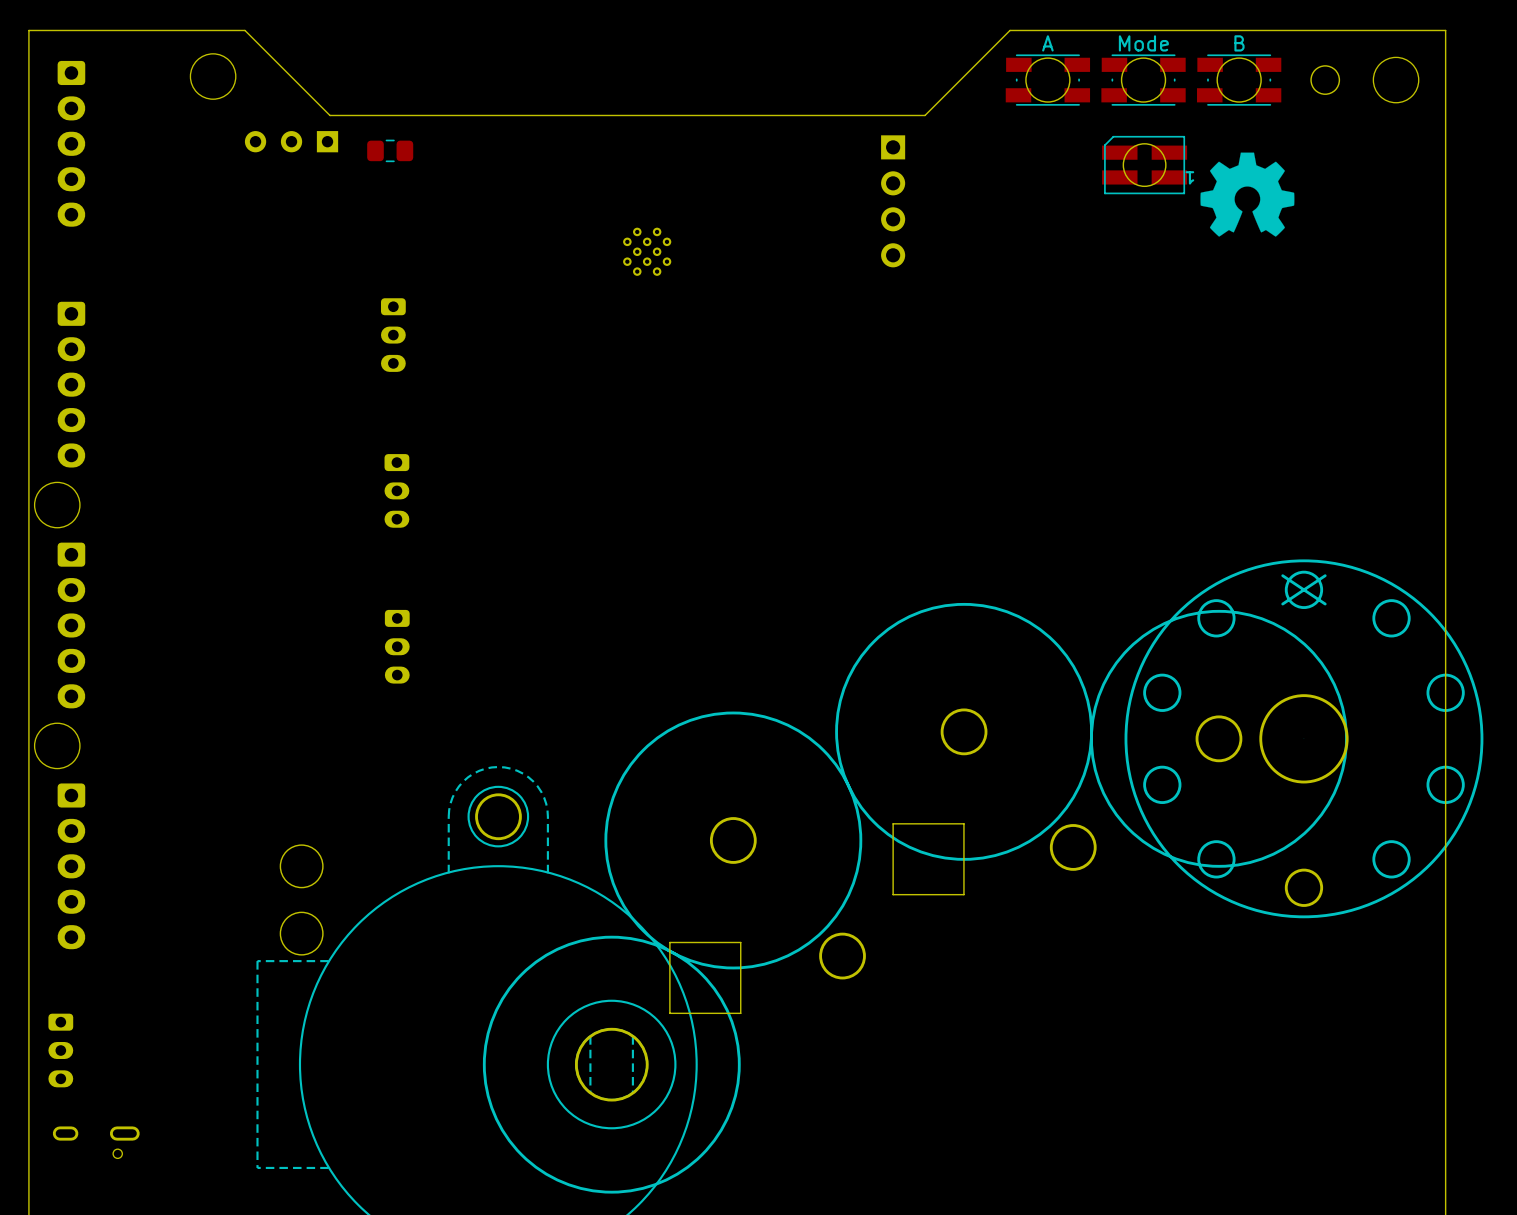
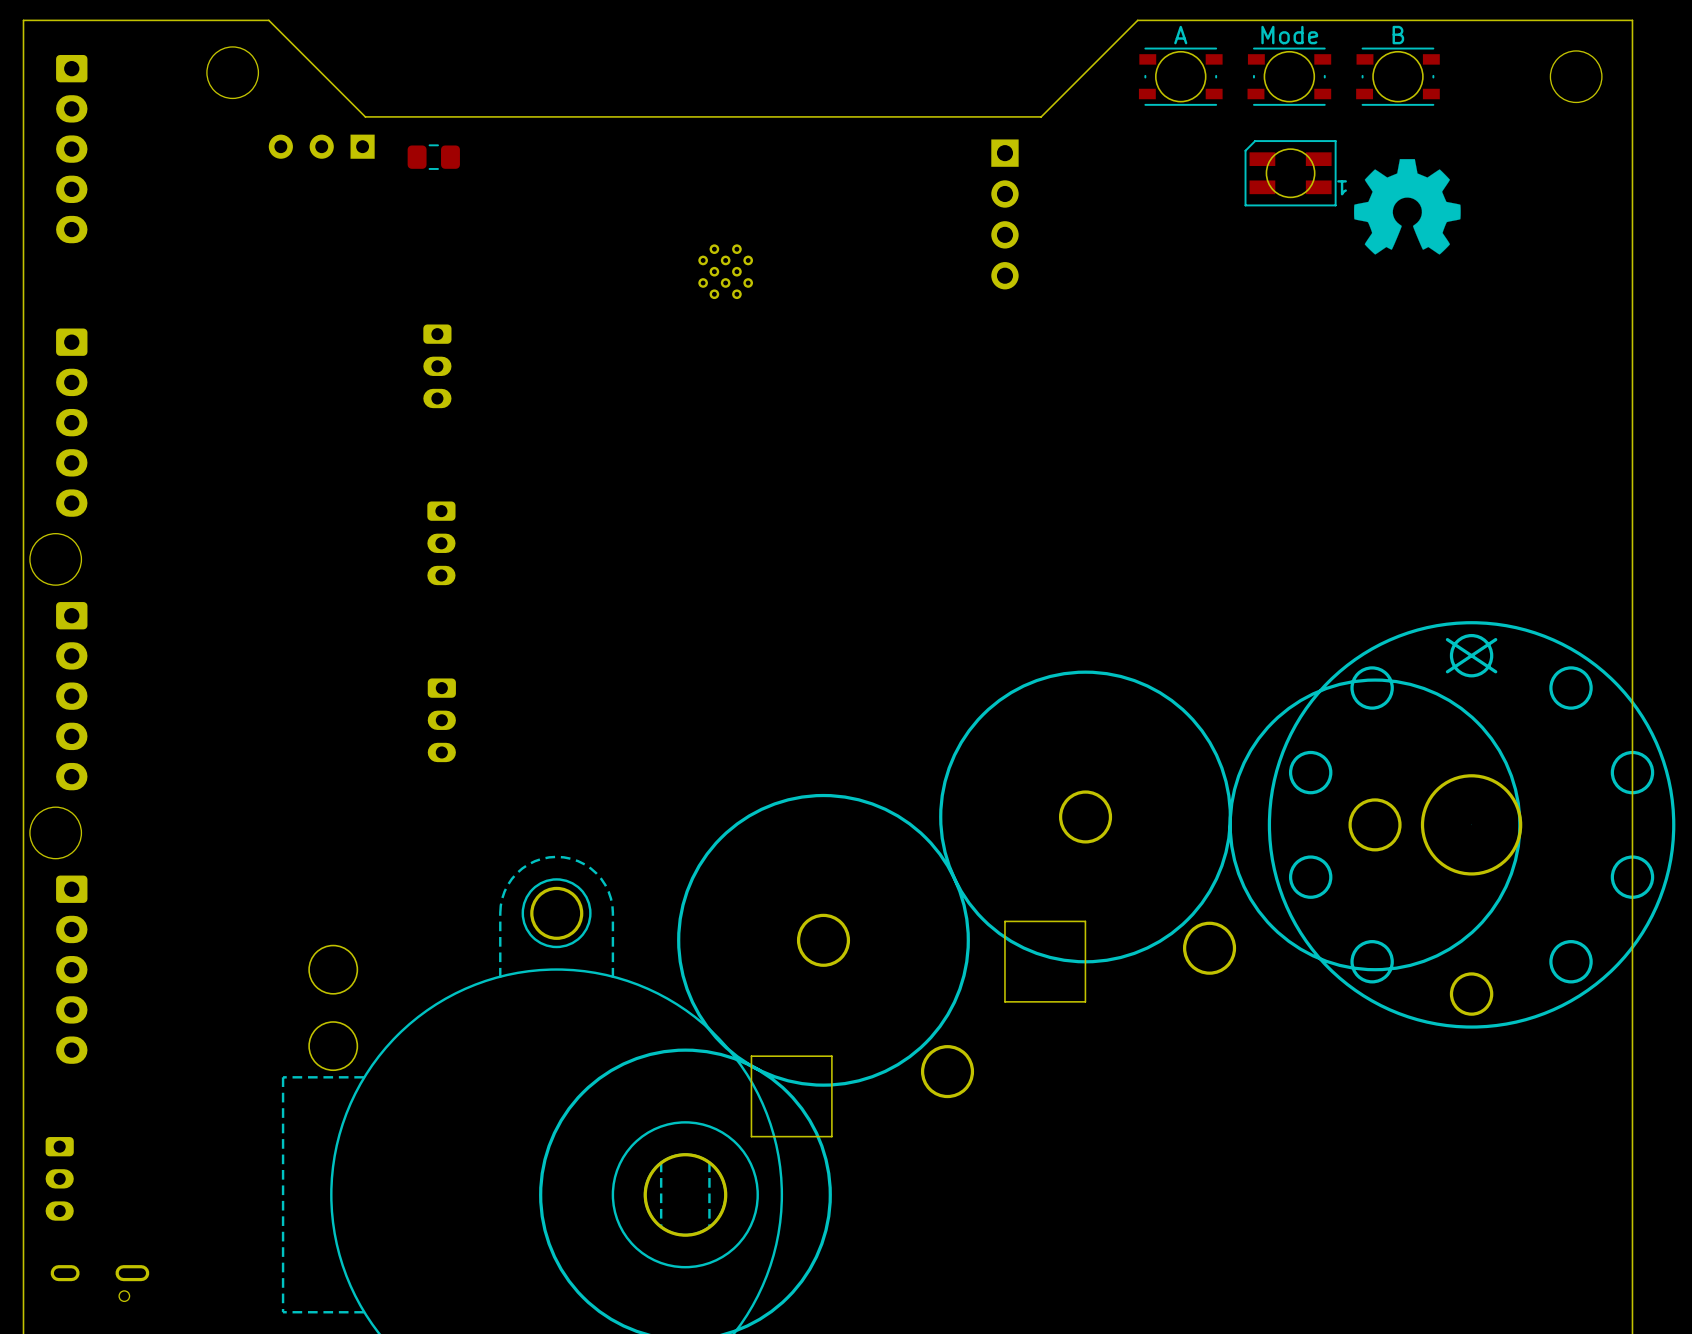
part footprint: [1005, 54, 1091, 106] -> [1138, 47, 1223, 106]
part footprint: [1101, 54, 1186, 106] -> [1247, 47, 1332, 106]
part footprint: [1197, 54, 1282, 106] -> [1356, 47, 1440, 106]
round board edge: [1310, 65, 1341, 95] -> none
part footprint: [1102, 135, 1188, 195] -> [1244, 140, 1337, 207]

